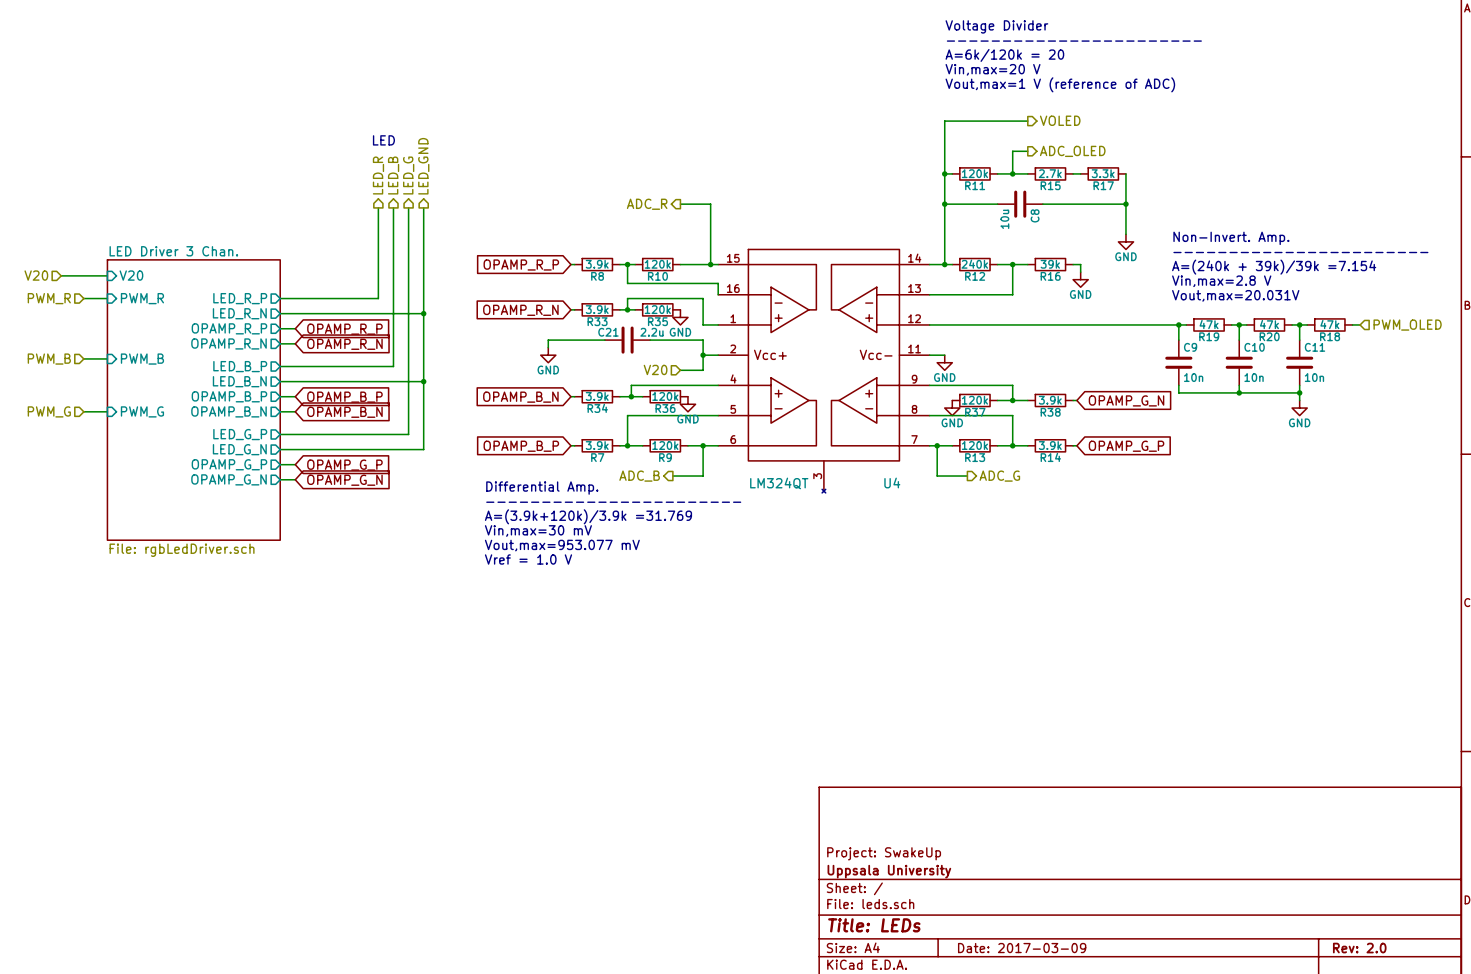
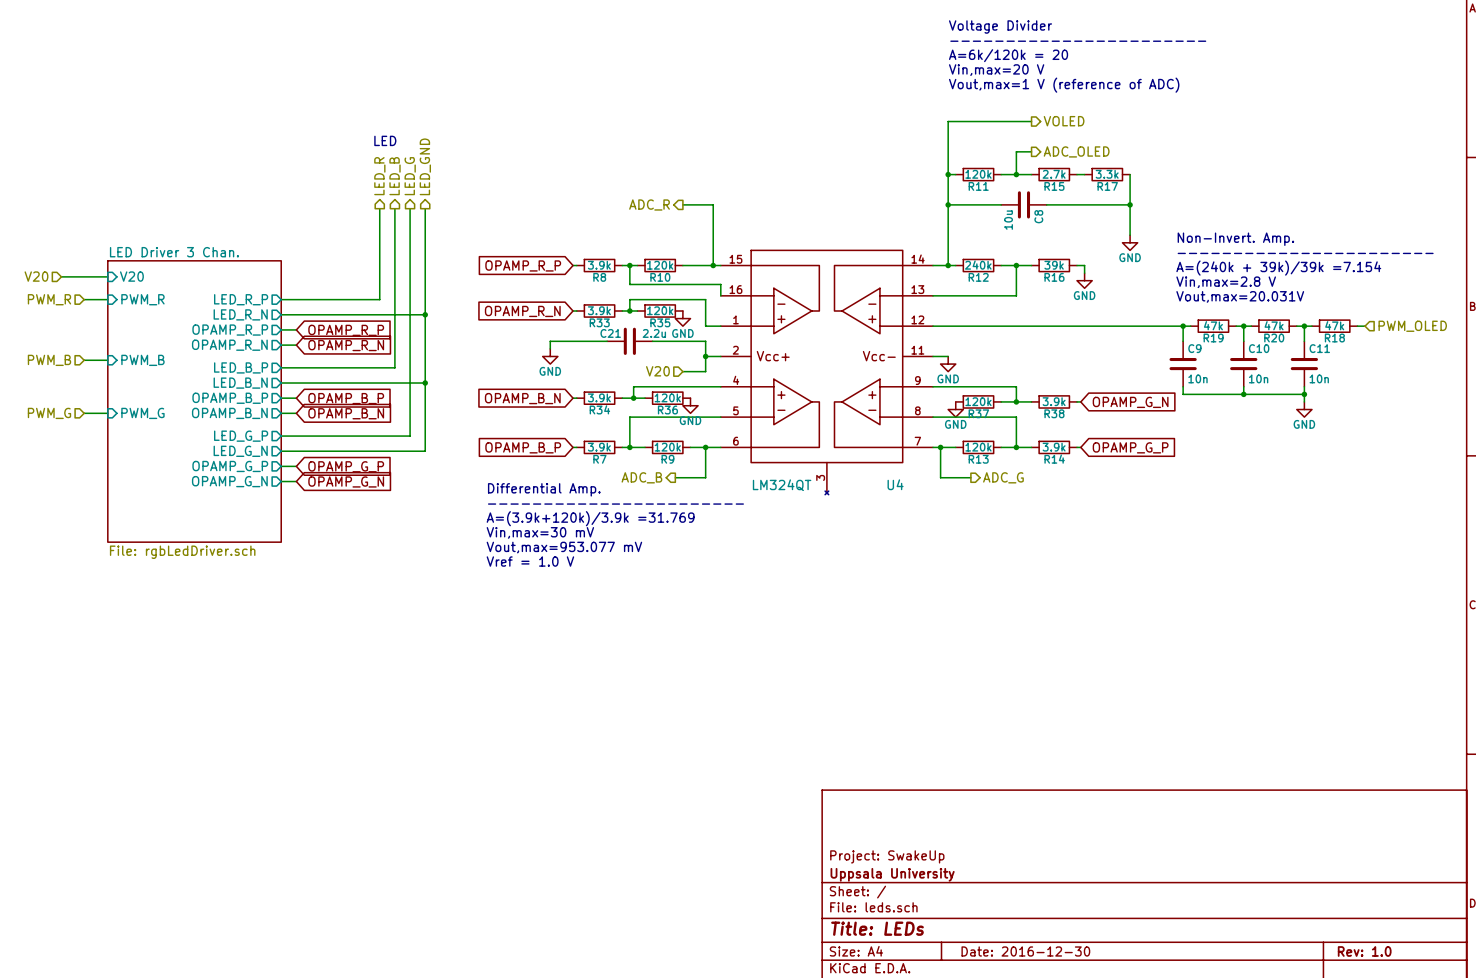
title block: Date: 2017-03-09 (1022, 948) -> Date: 2016-12-30 (1025, 951)
title block: Rev: 2.0 (1359, 948) -> Rev: 1.0 (1364, 951)

